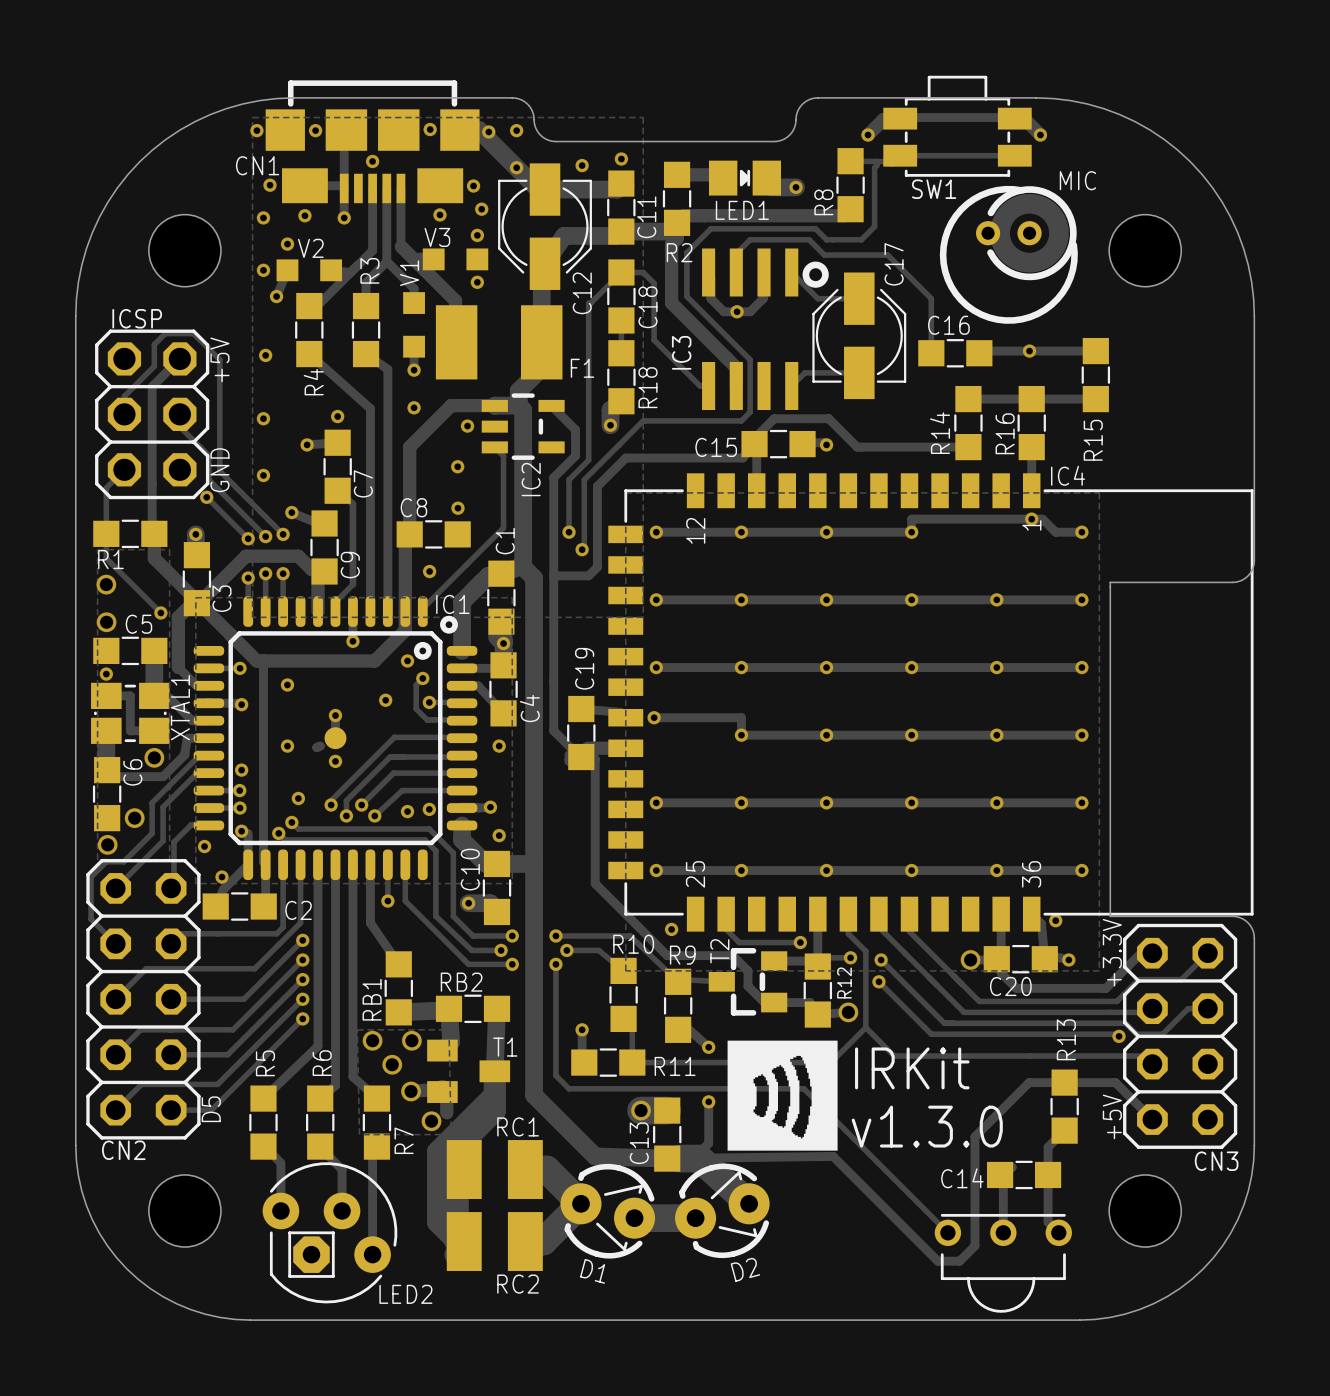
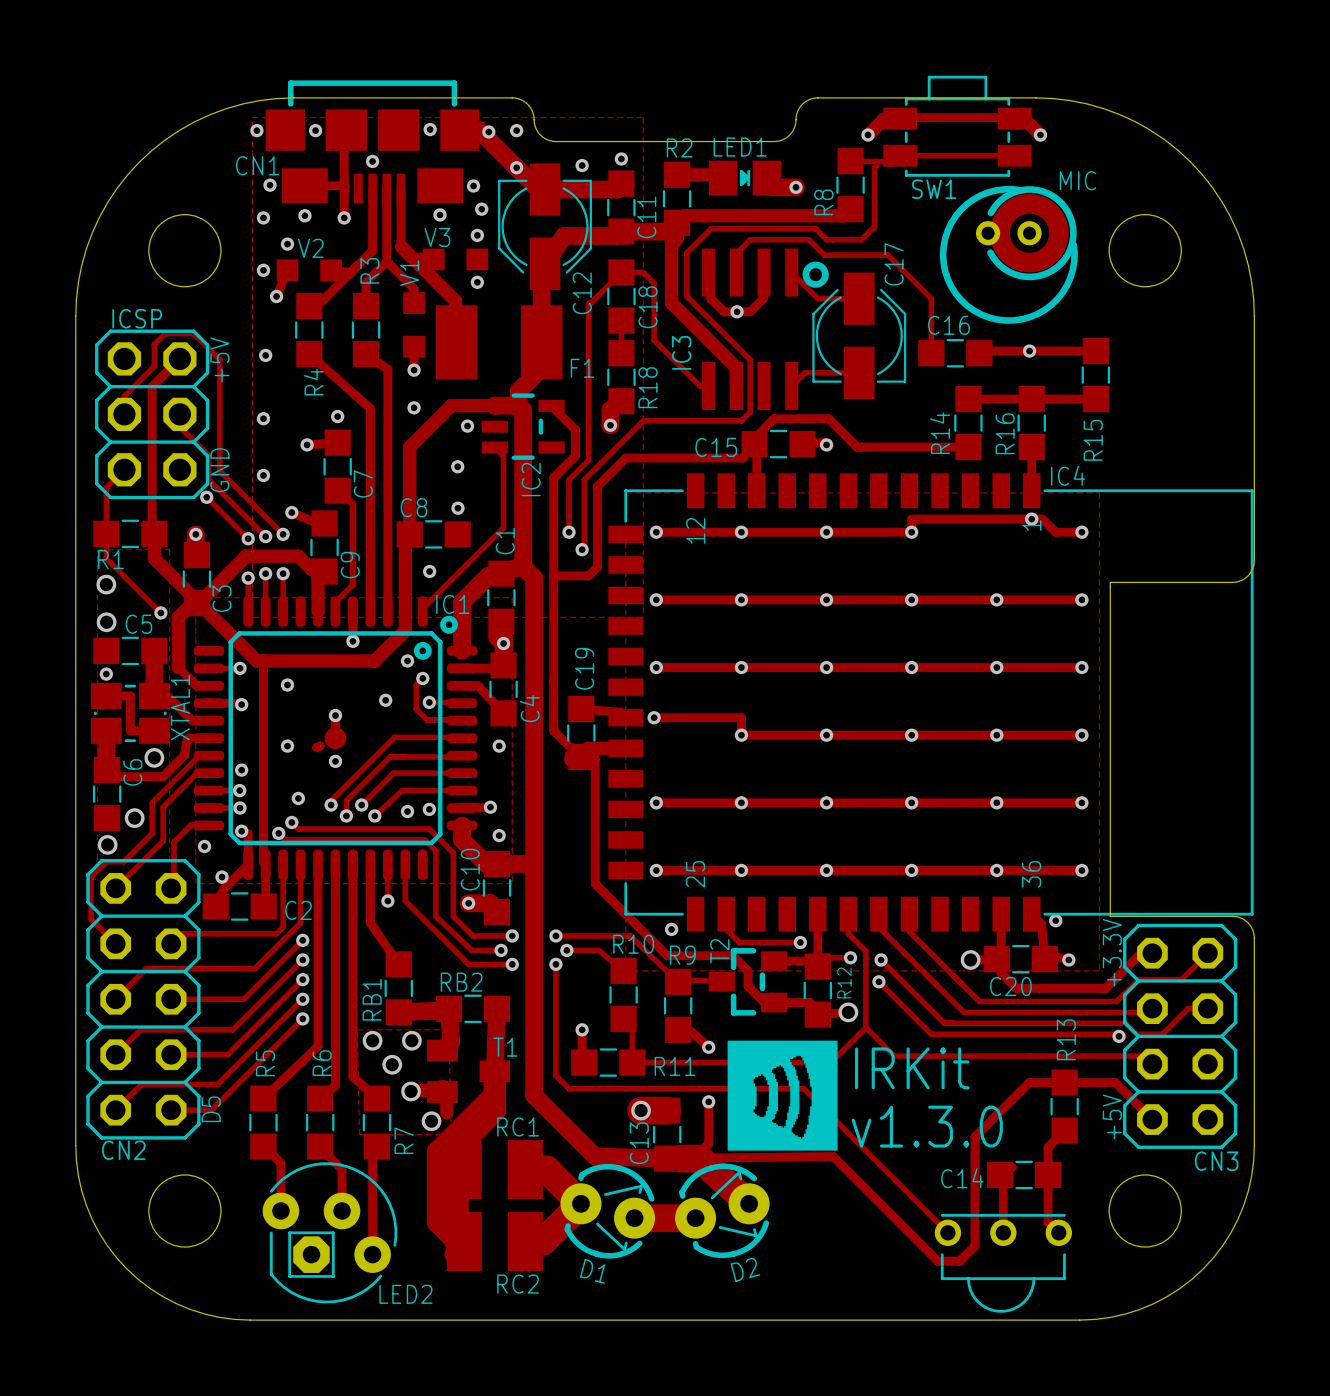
LED1 name position: LED1 (742, 210) -> LED1 (740, 147)
R2 name position: R2 (679, 252) -> R2 (679, 147)

